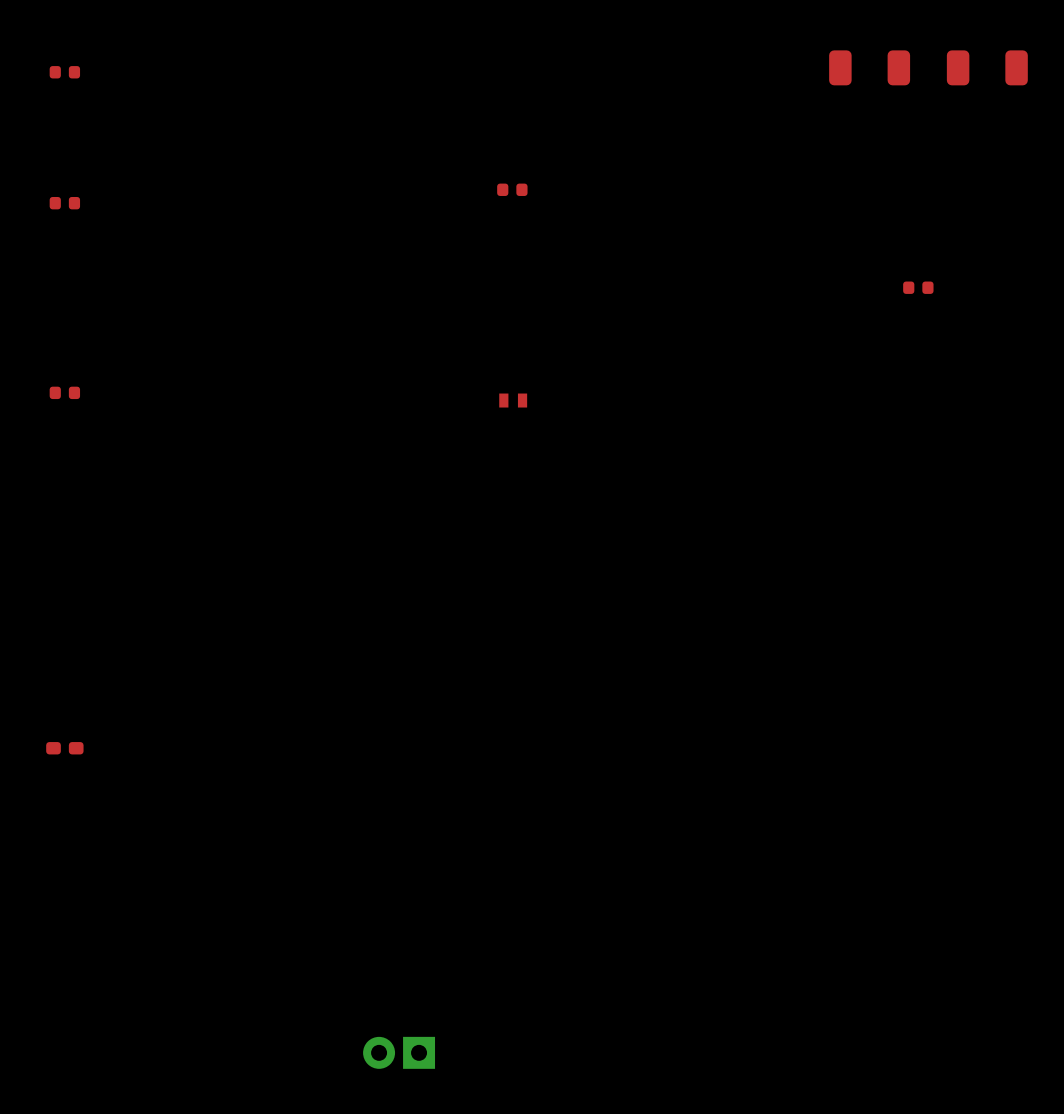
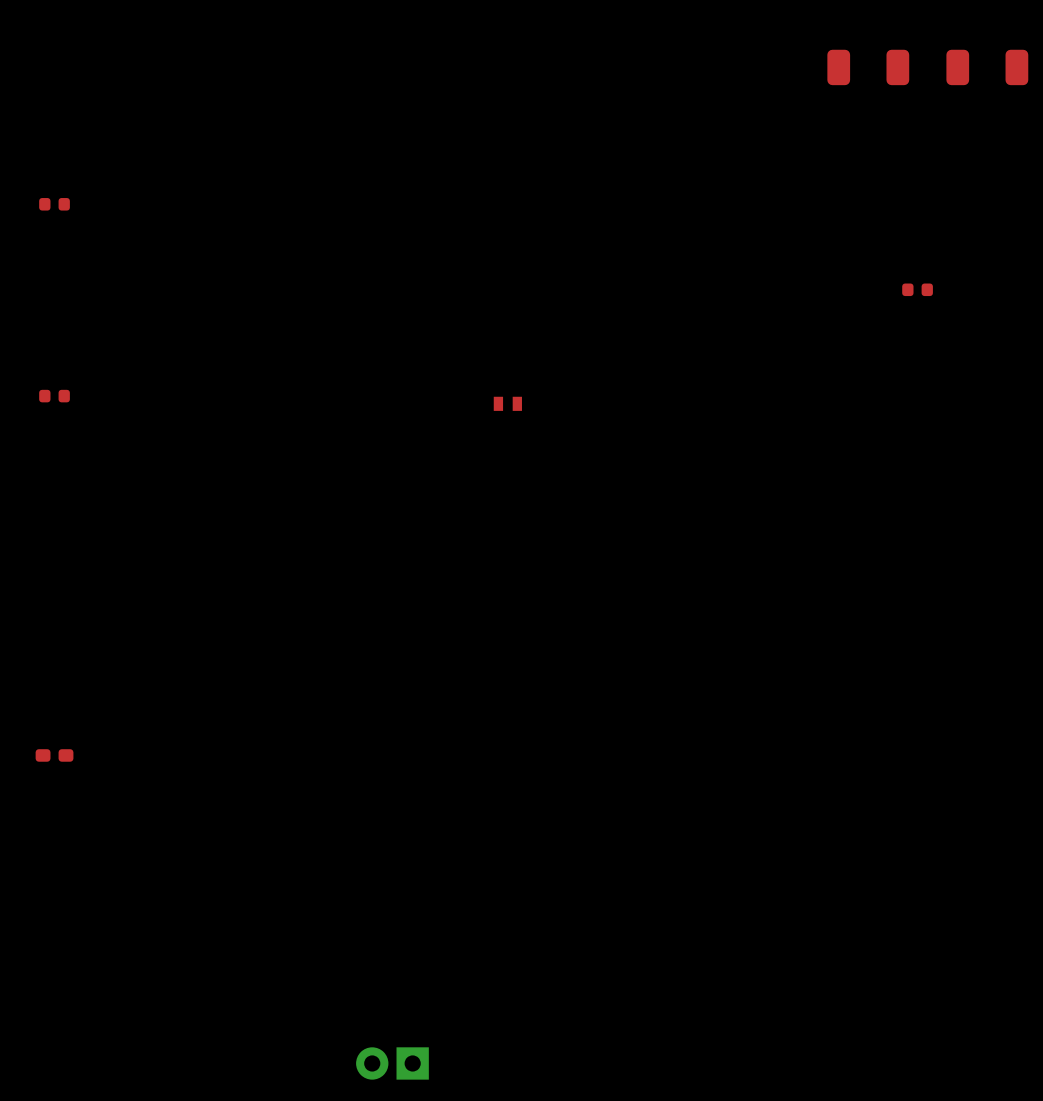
part: (64, 72) -> none
part: (512, 189) -> none

